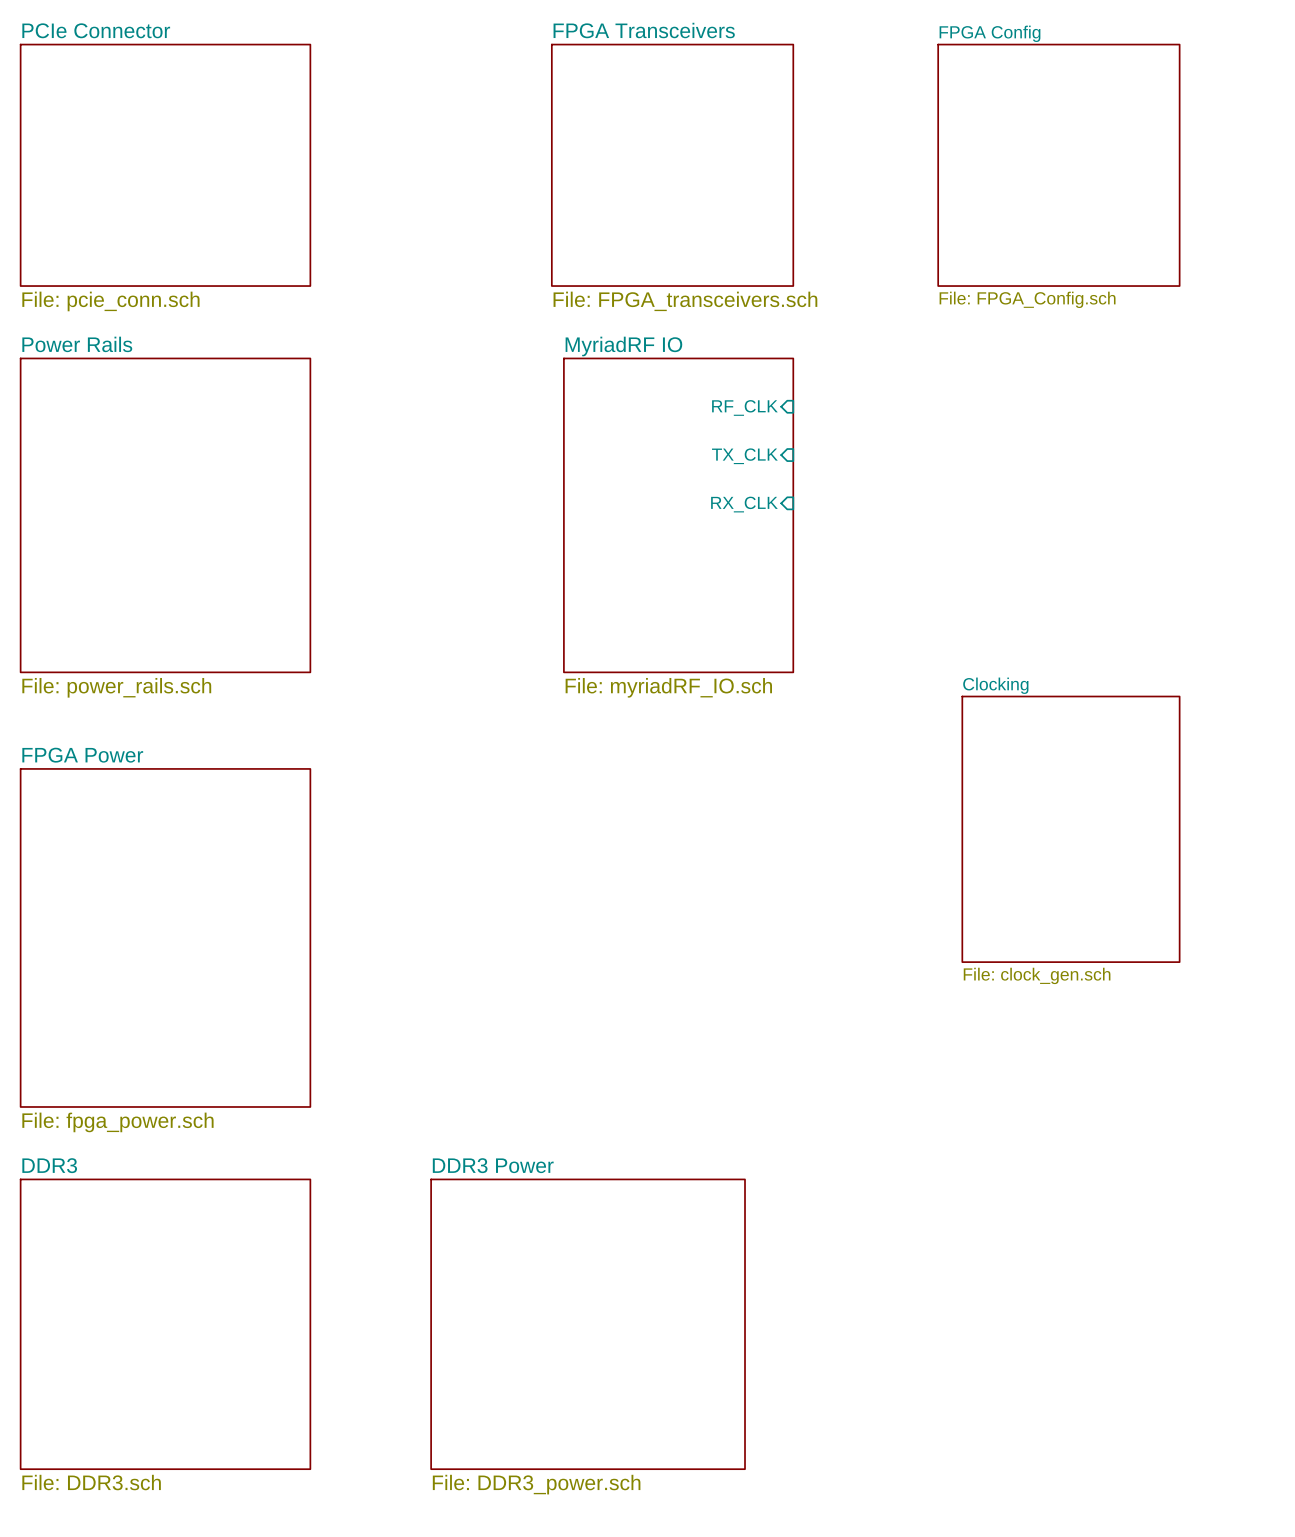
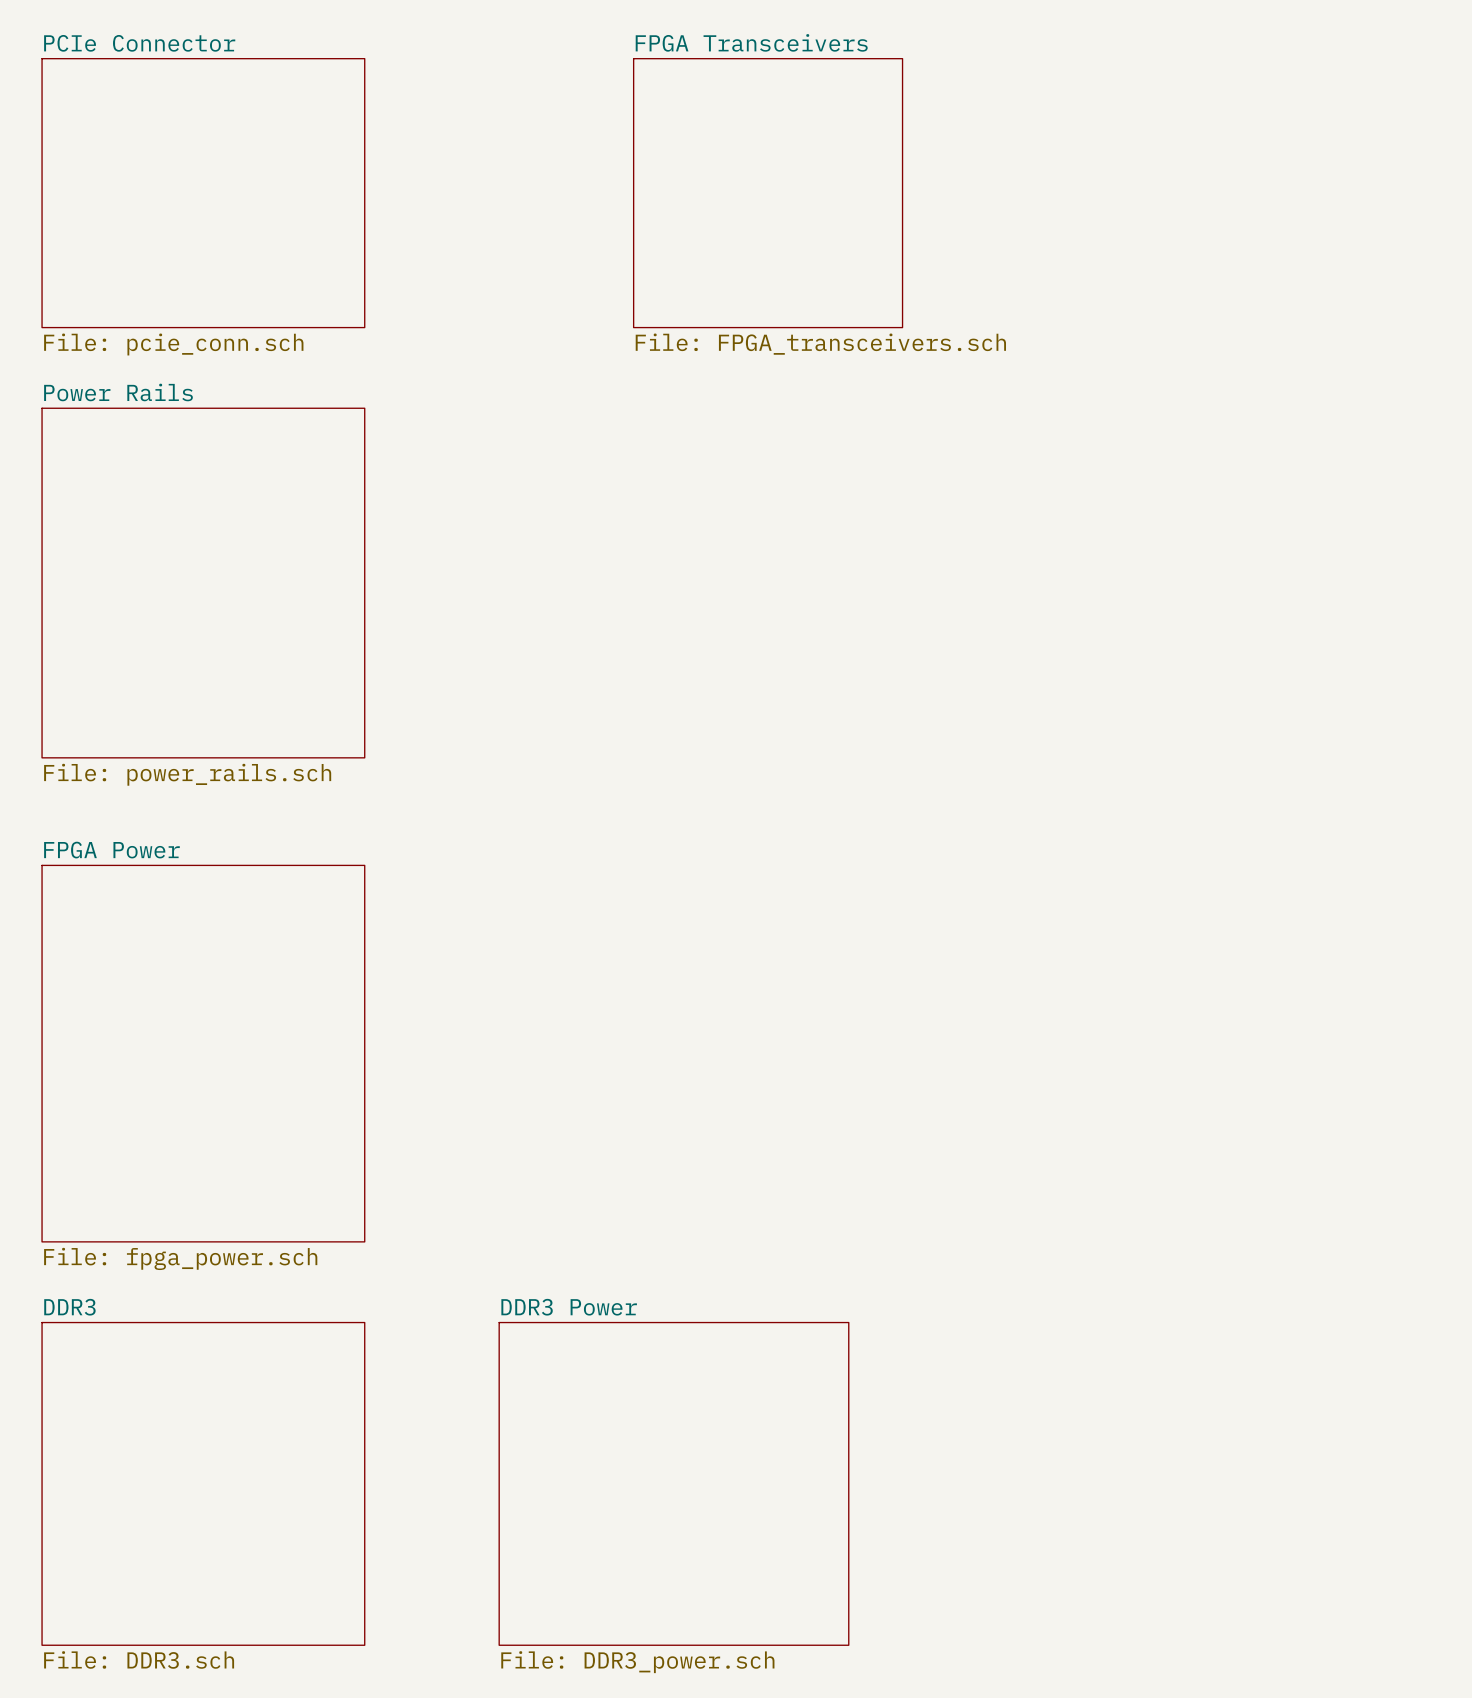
sheet FPGA Config: File: FPGA_Config.sch (1058, 165) -> none
sheet pin: RF_CLK (744, 407) -> none
sheet pin: TX_CLK (744, 456) -> none
sheet pin: RX_CLK (744, 504) -> none
sheet MyriadRF IO: File: myriadRF_IO.sch (678, 515) -> none
sheet Clocking: File: clock_gen.sch (1070, 829) -> none

